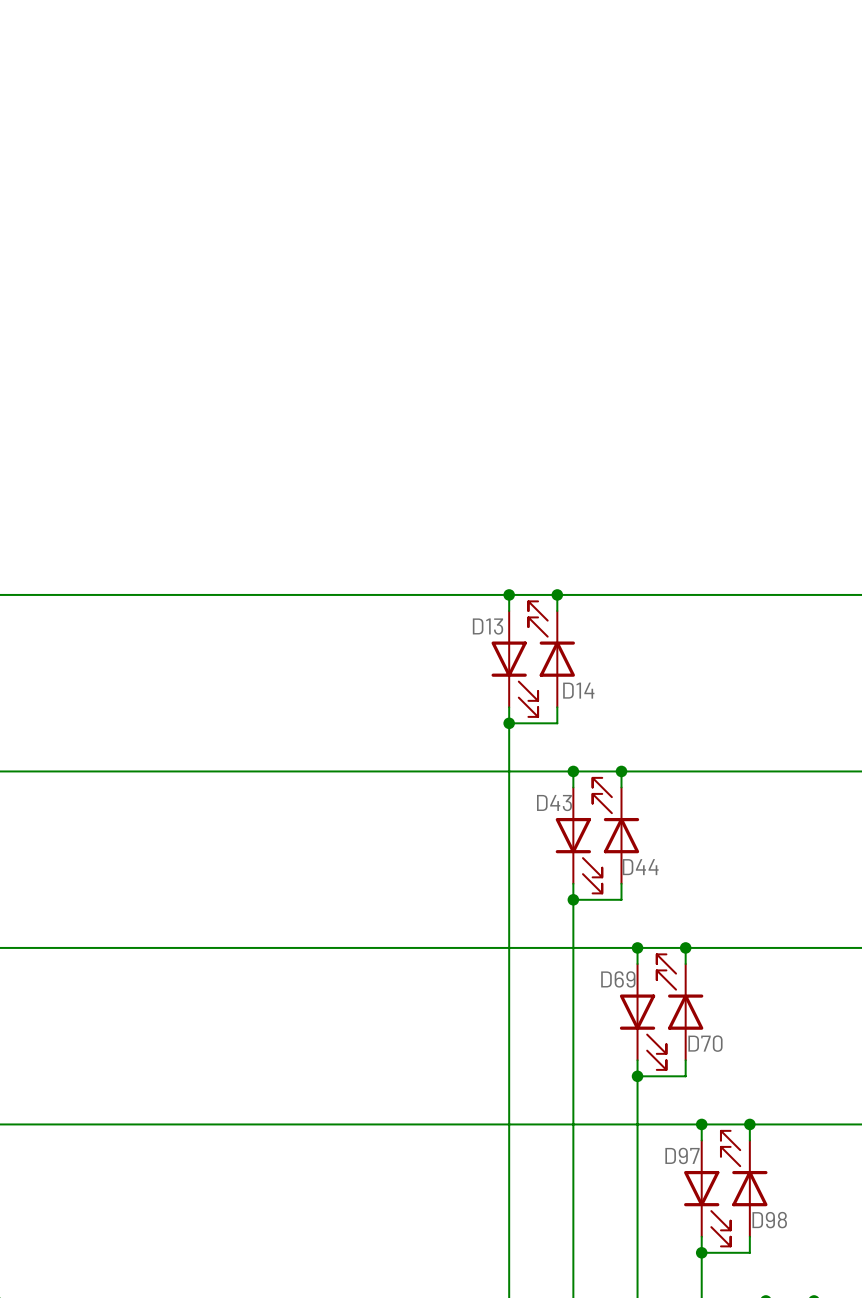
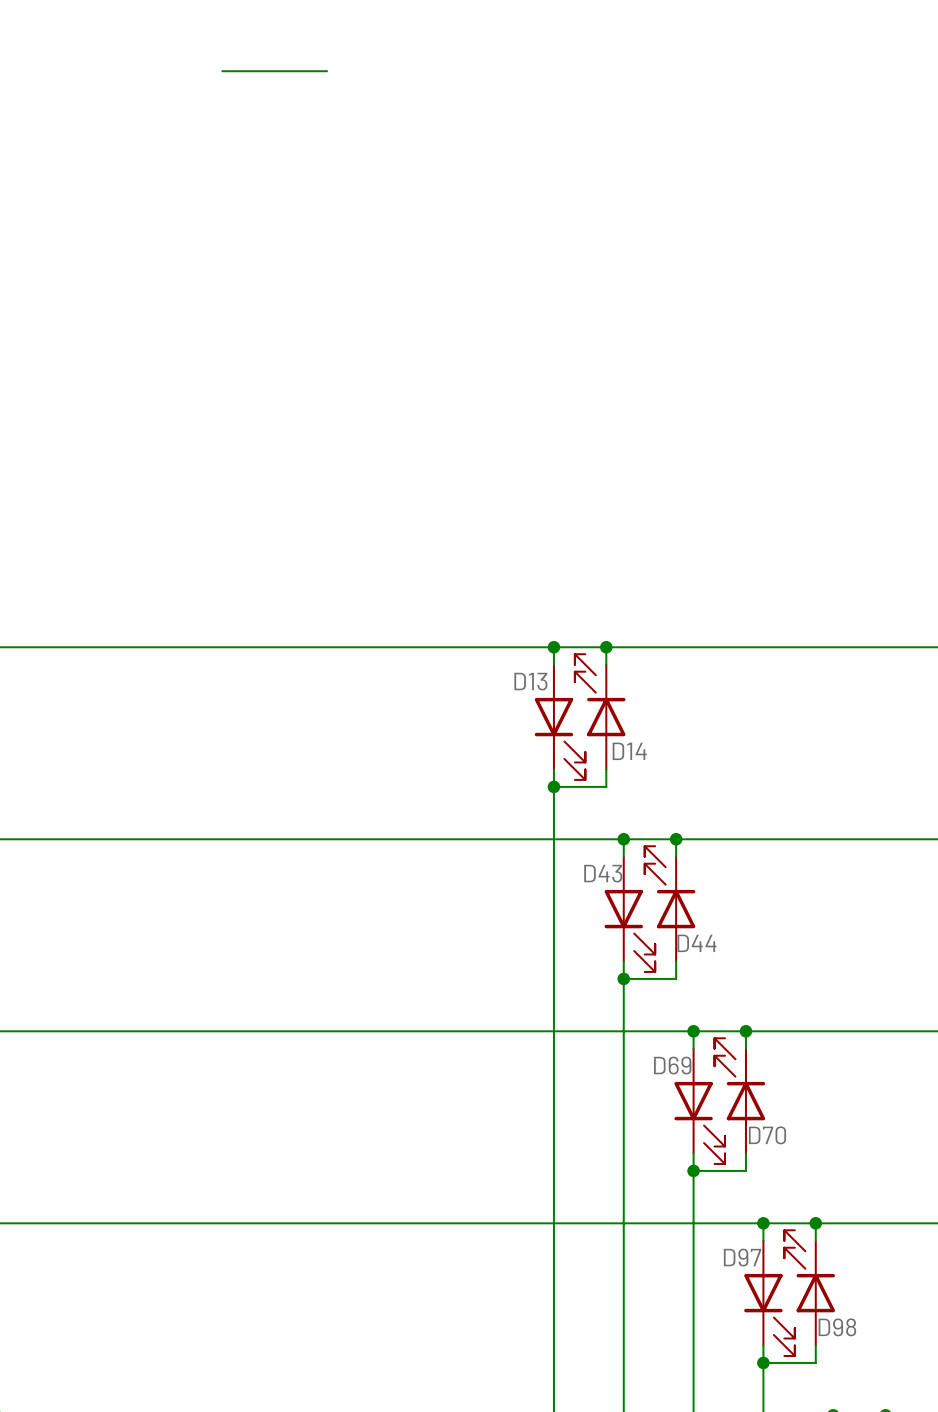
wire: none -> (222, 71) (327, 71)

